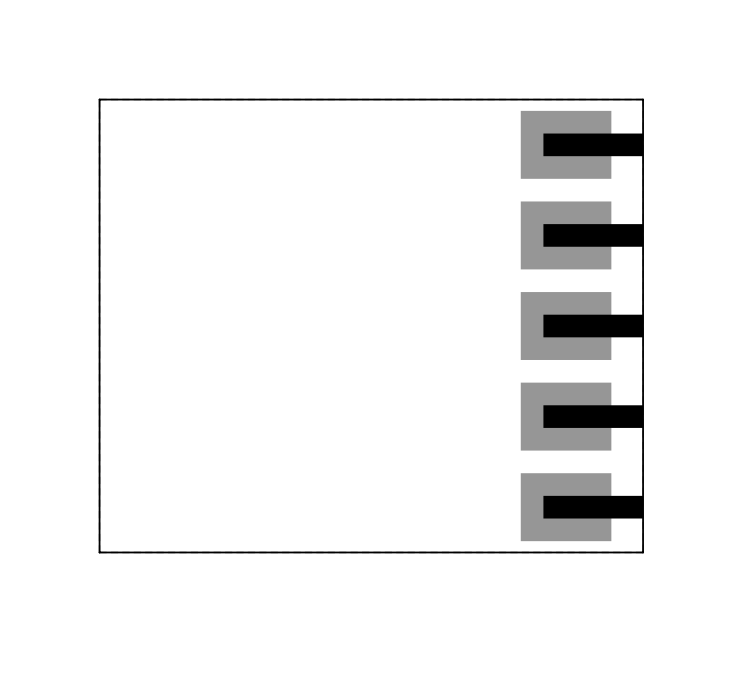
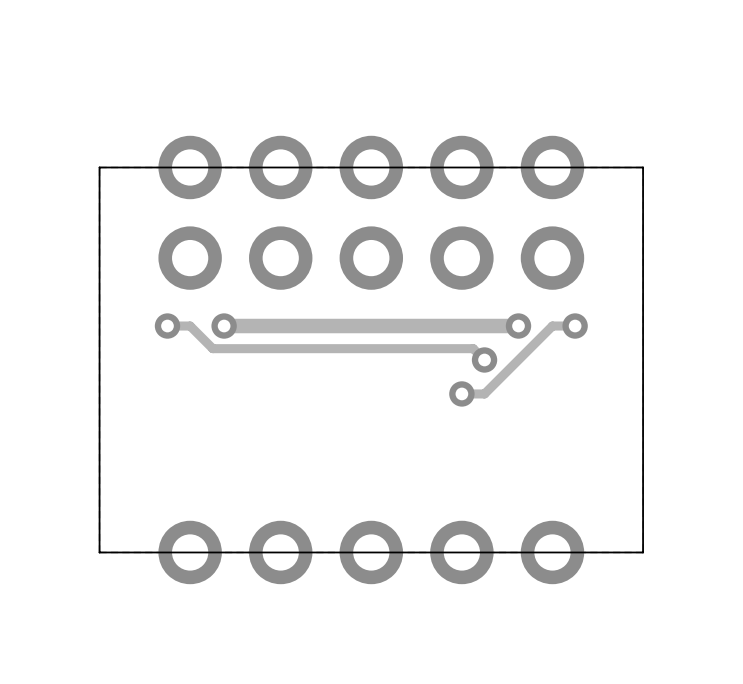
board edge: (643, 167) (643, 99) (99, 99) (99, 167) -> (643, 167) (99, 167)
part: none -> (371, 212)
track: none -> (167, 326) (190, 326) (212, 348) (473, 348) (484, 359)
via: none -> (167, 326)
via: none -> (224, 326)
track: none -> (518, 326) (224, 326)
via: none -> (518, 326)
track: none -> (575, 326) (552, 326) (484, 393) (461, 393)
via: none -> (575, 326)
part: (581, 326) -> none
via: none -> (484, 359)
via: none -> (461, 393)
part: none -> (371, 552)

